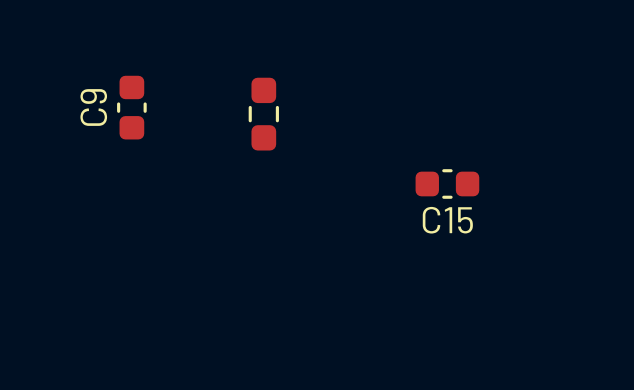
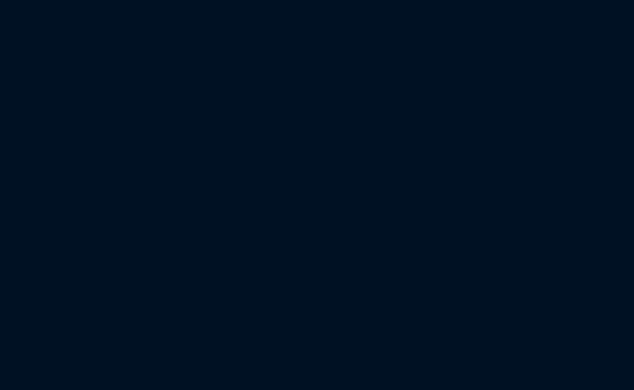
C9: (131, 107) -> none
part: (263, 114) -> none
C15: (447, 183) -> none

